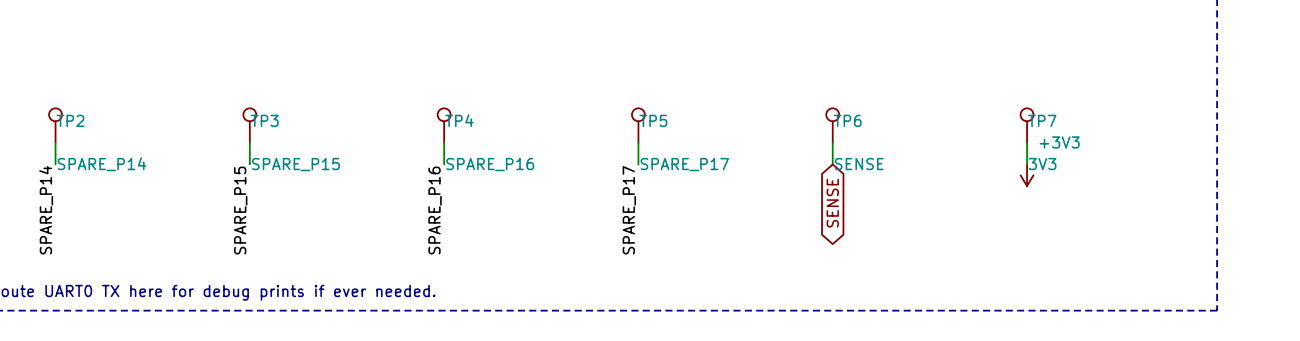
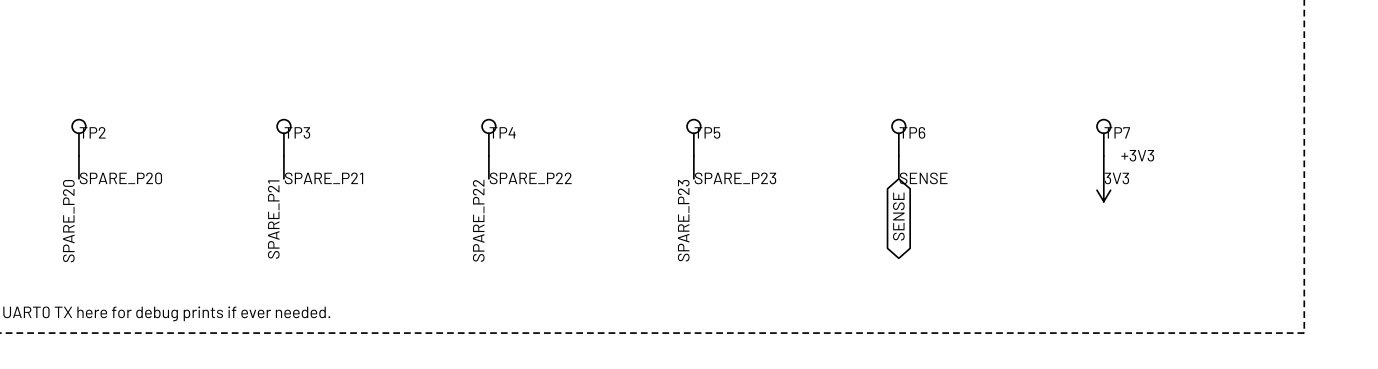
TP2 value: SPARE_P14 (101, 164) -> SPARE_P20 (120, 178)
TP3 value: SPARE_P15 (295, 164) -> SPARE_P21 (323, 178)
TP4 value: SPARE_P16 (490, 164) -> SPARE_P22 (530, 178)
TP5 value: SPARE_P17 (684, 164) -> SPARE_P23 (735, 178)
label: SPARE_P14 (46, 210) -> SPARE_P20 (68, 221)
label: SPARE_P15 (240, 210) -> SPARE_P21 (273, 219)
label: SPARE_P16 (435, 210) -> SPARE_P22 (478, 220)
label: SPARE_P17 (629, 210) -> SPARE_P23 (683, 220)

